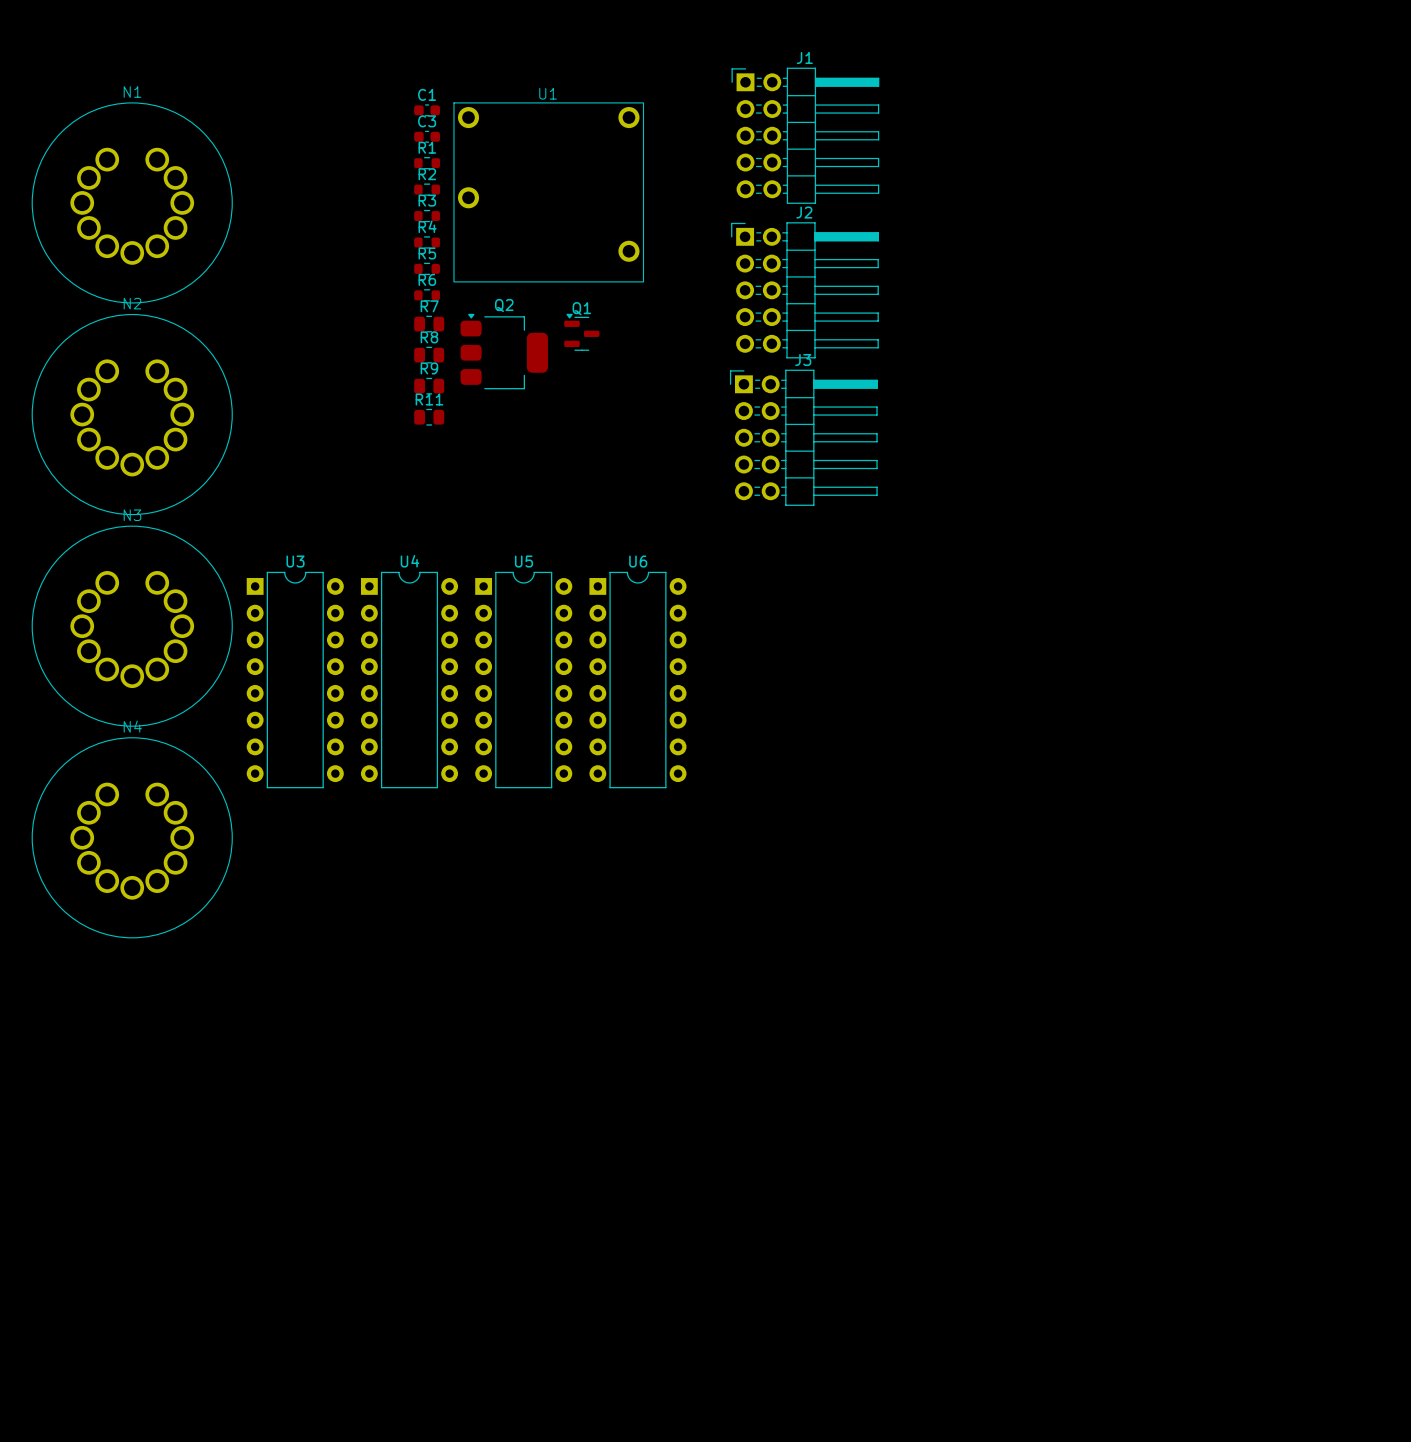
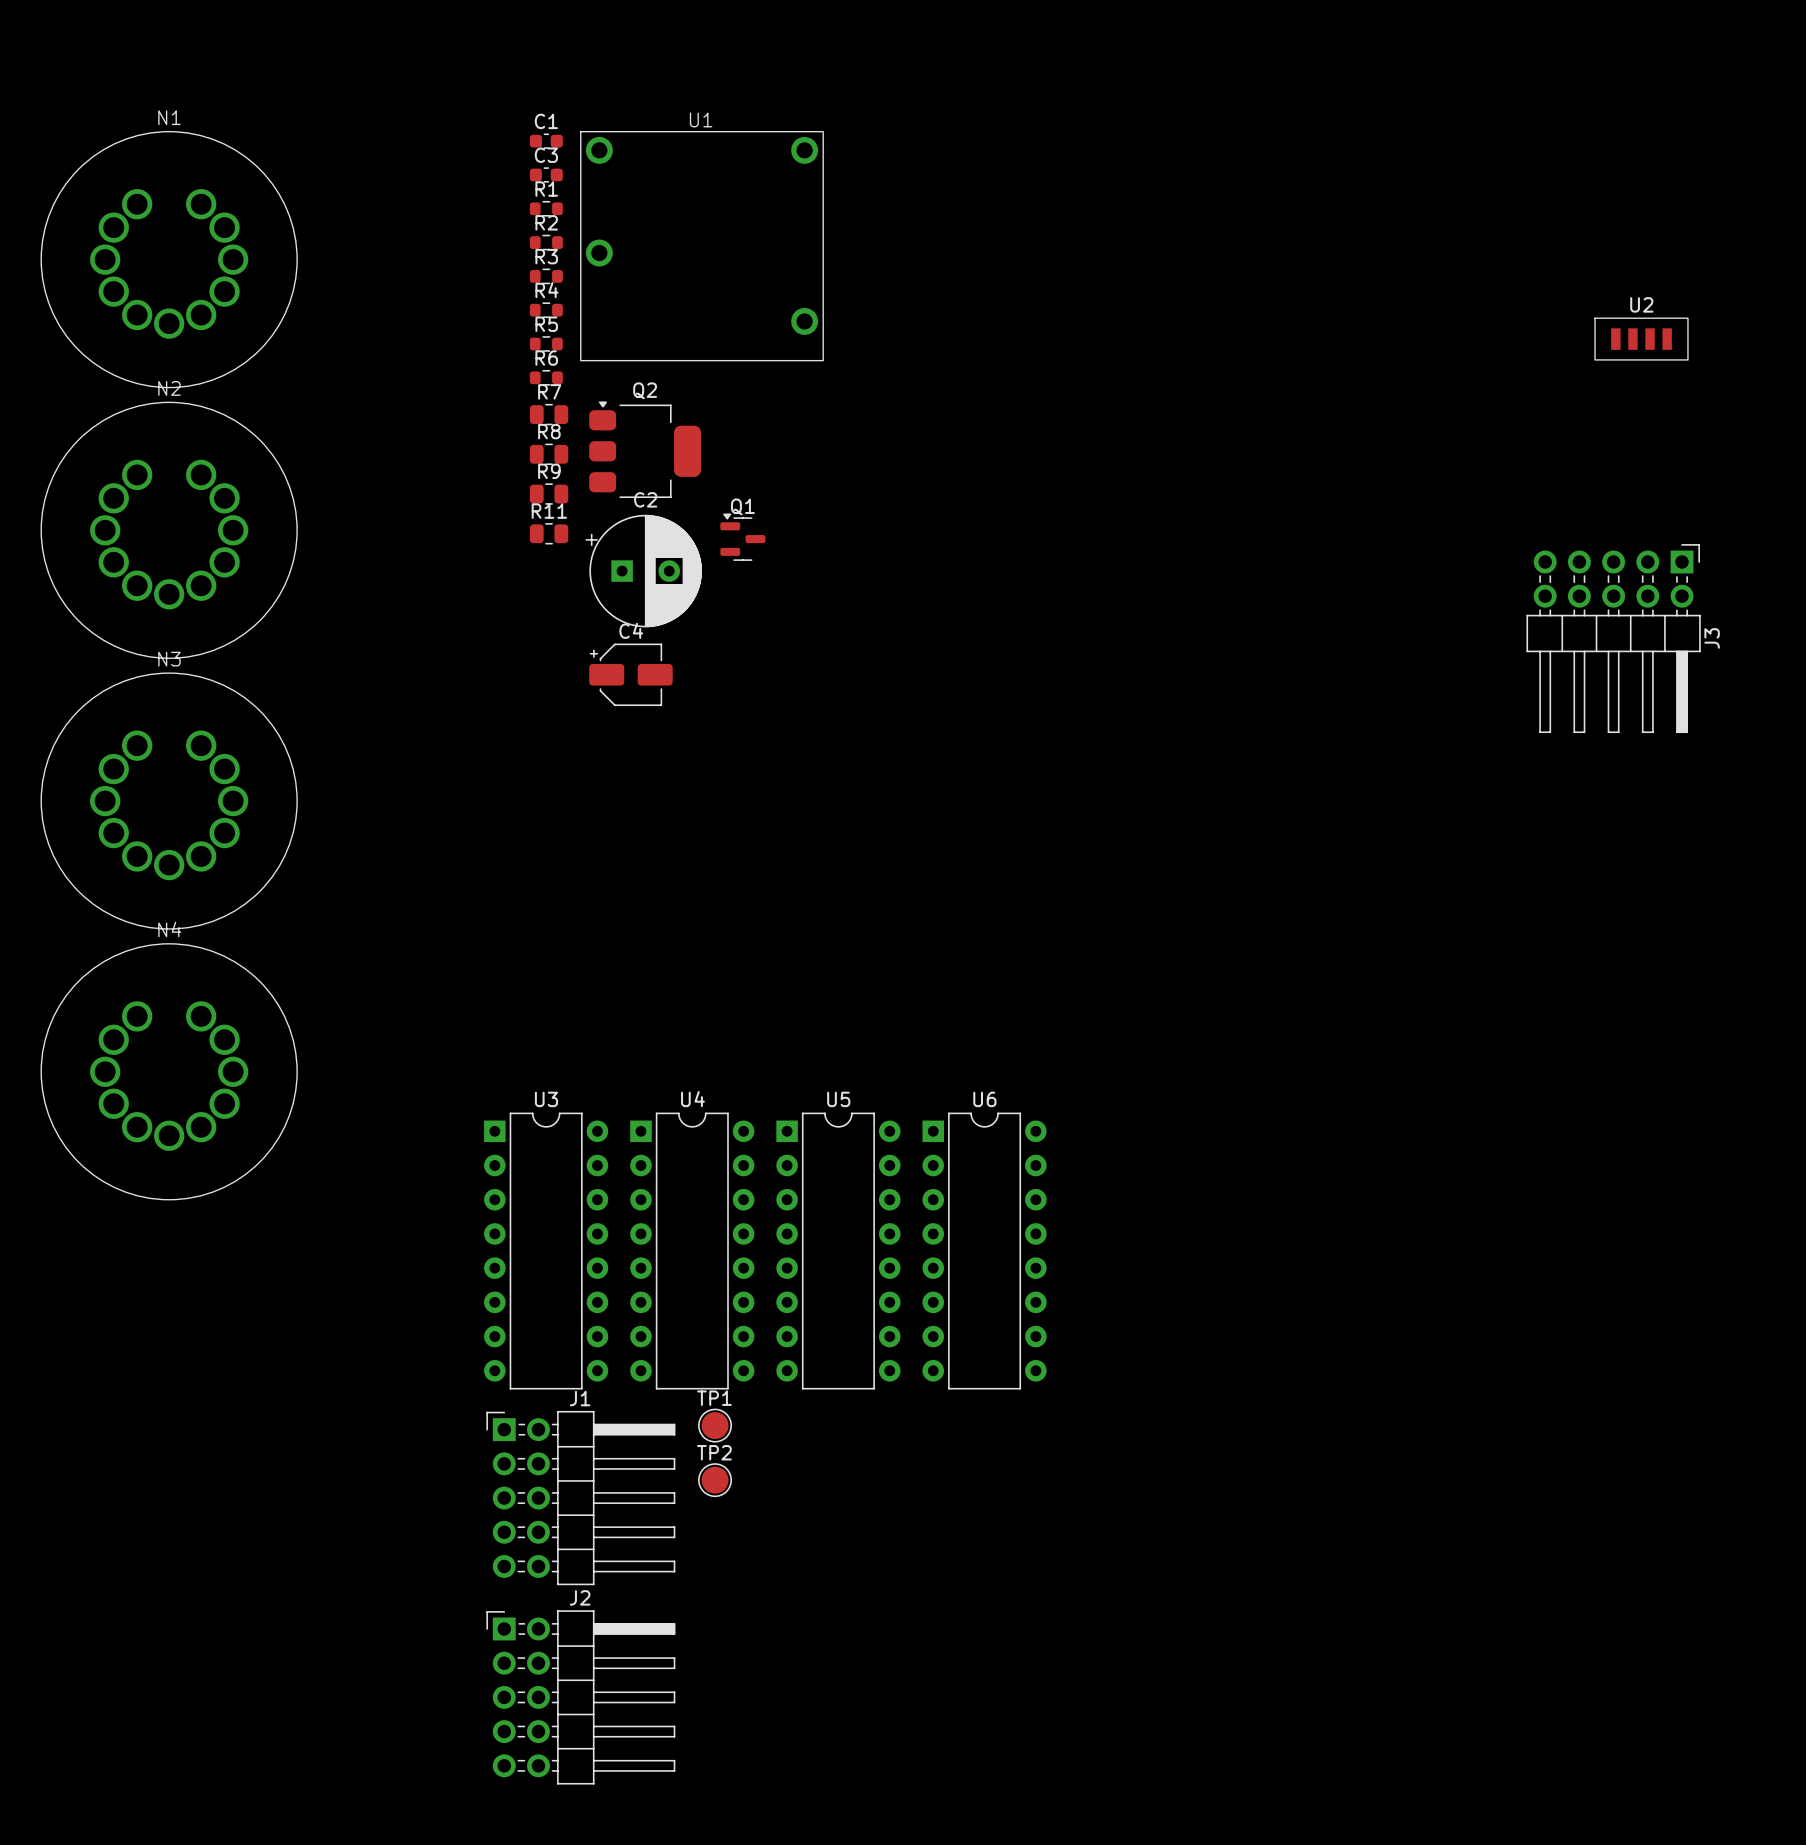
J1 position: (805, 135) -> (580, 1498)
U2: none -> (1641, 339)
J2 position: (804, 290) -> (580, 1697)
Q1 position: (581, 332) -> (742, 537)
J3 rotation: 0° (803, 437) -> 90° clockwise (1613, 638)
J3 position: (803, 437) -> (1613, 638)
C2: none -> (643, 571)
C4: none -> (630, 674)
U3 position: (295, 680) -> (546, 1251)
U4 position: (409, 680) -> (692, 1251)
U5 position: (523, 680) -> (838, 1251)
U6 position: (637, 680) -> (984, 1251)
TP1: none -> (715, 1425)
TP2: none -> (715, 1480)

